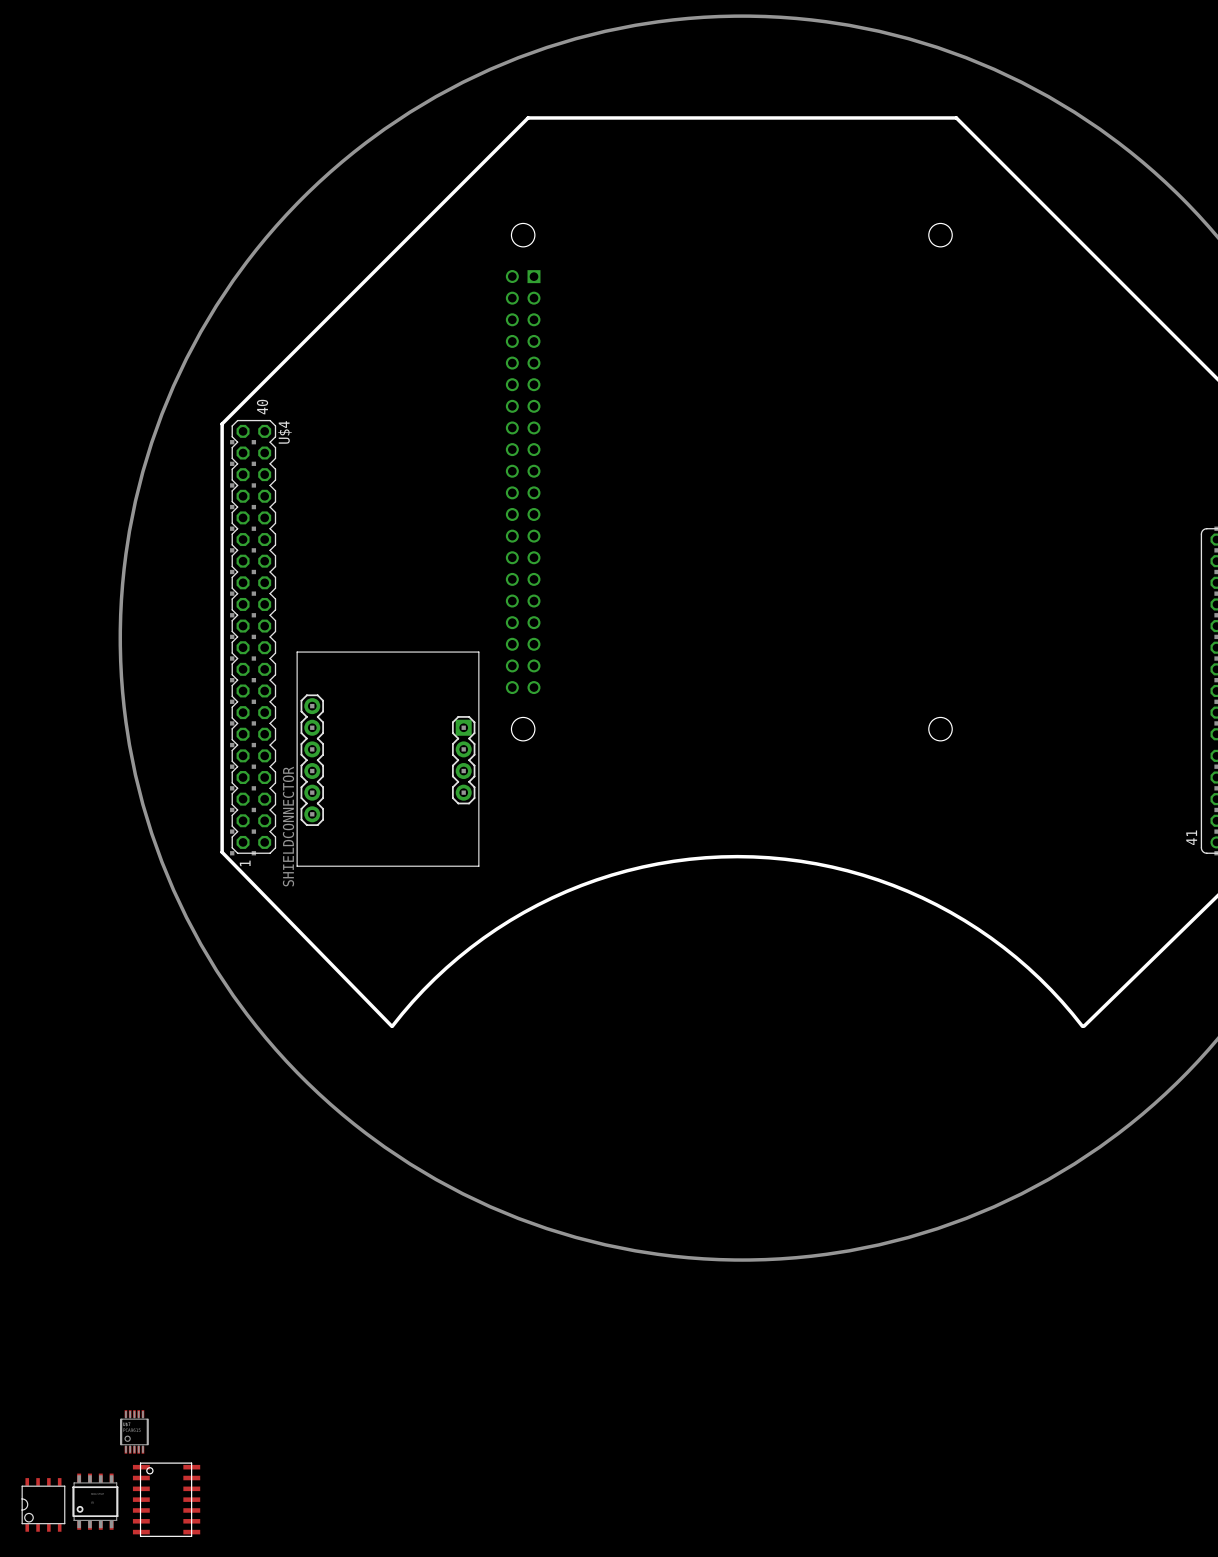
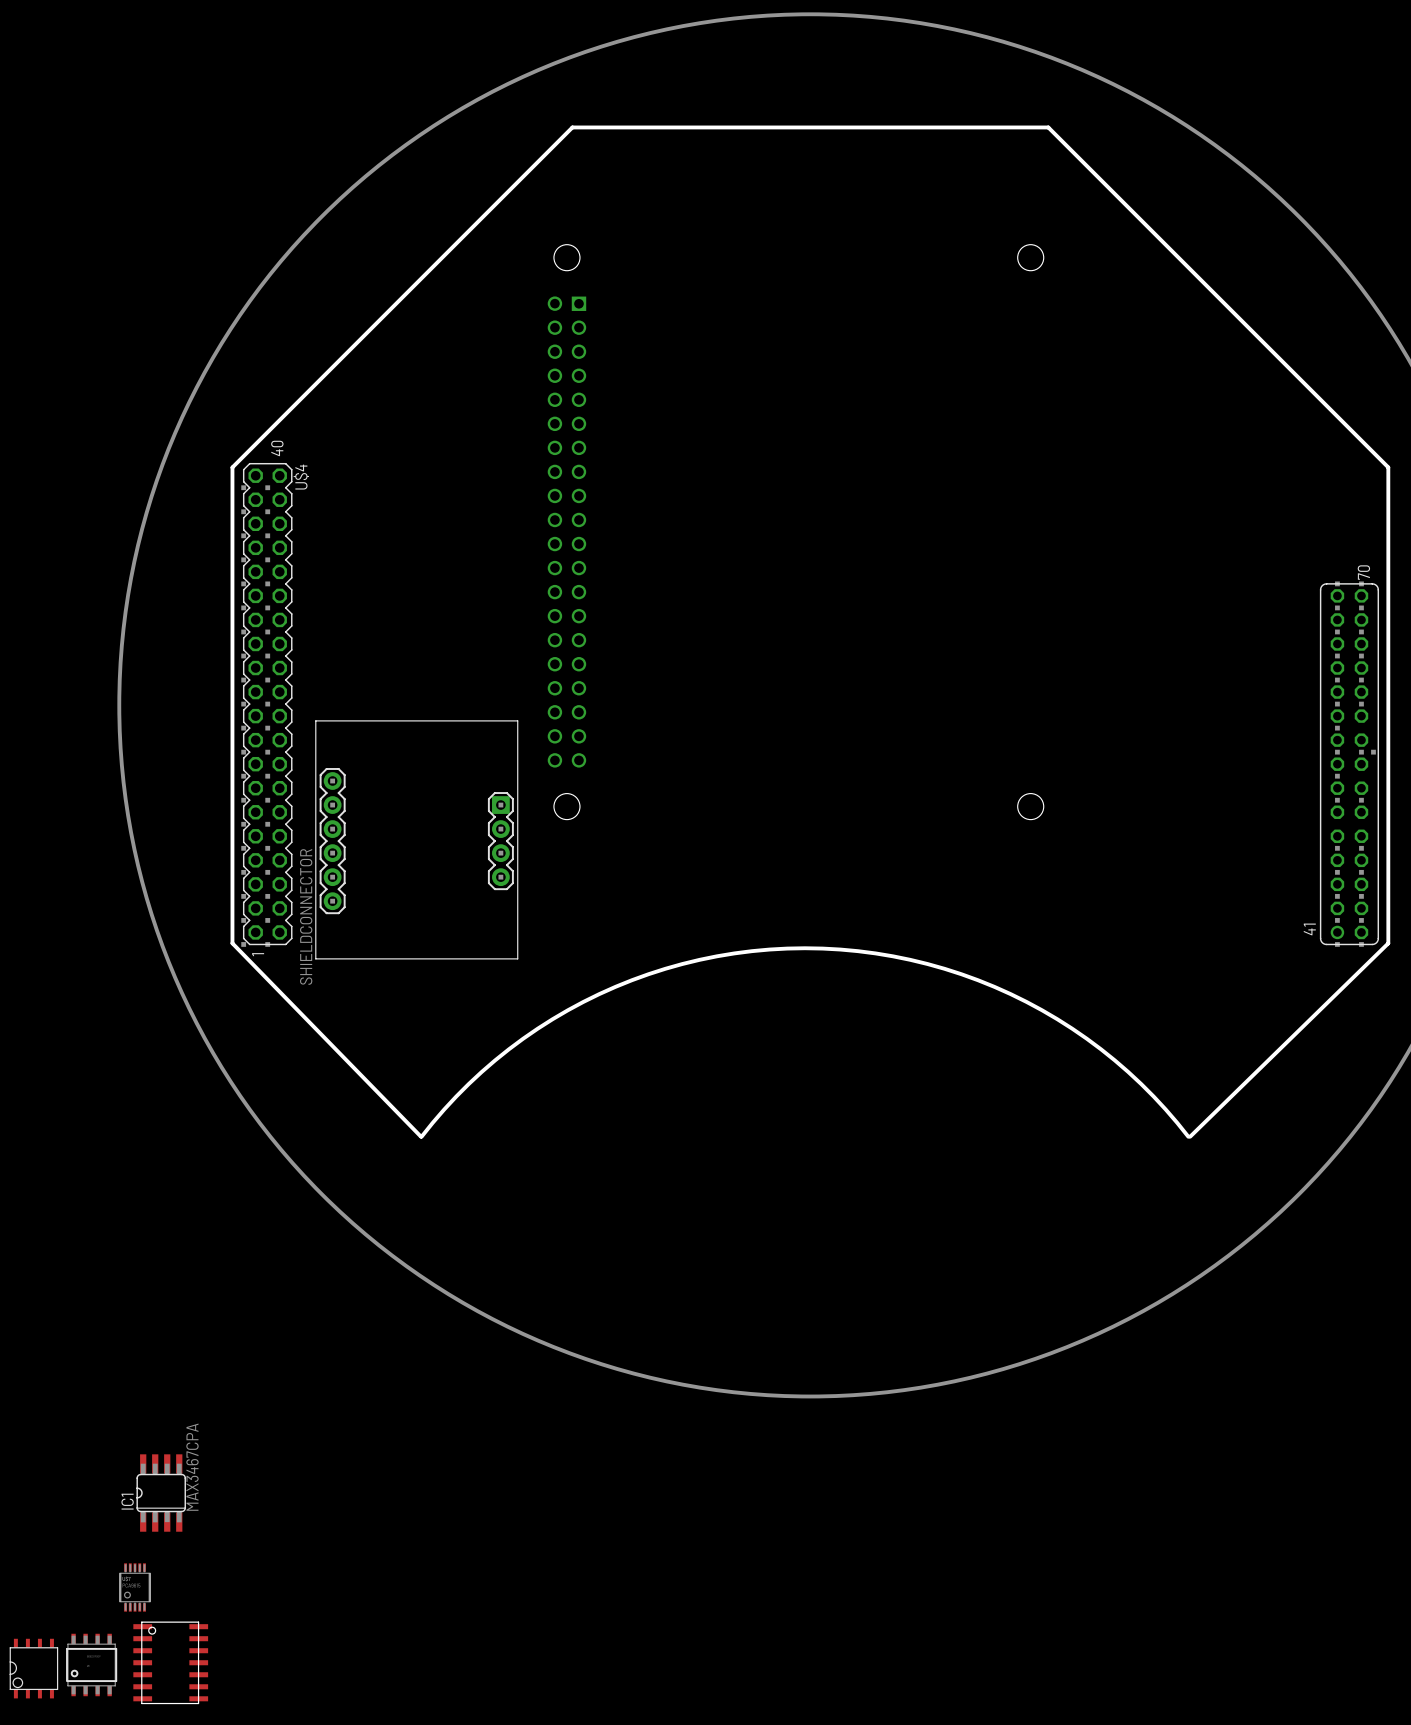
IC1: none -> MAX3467CPA (161, 1493)

